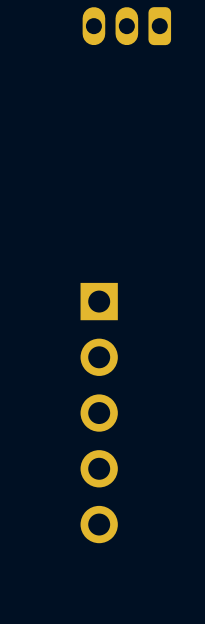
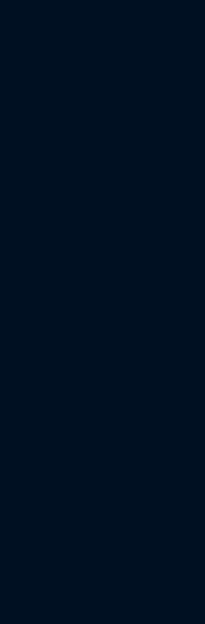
part: (126, 26) -> none
part: (99, 413) -> none

